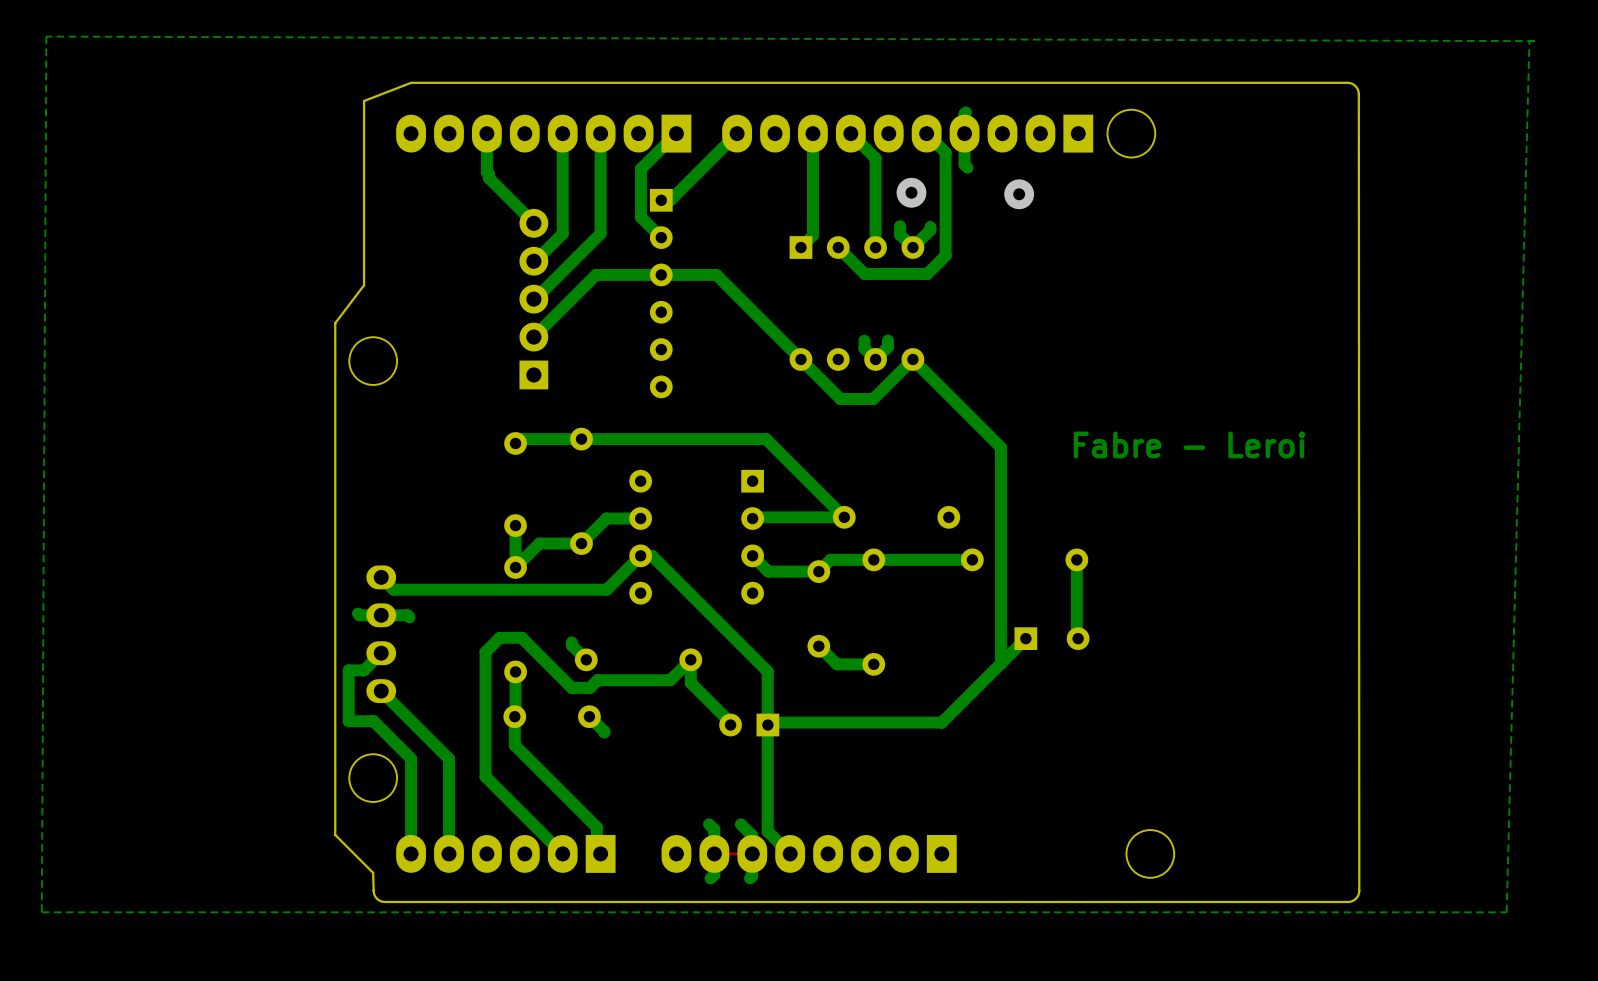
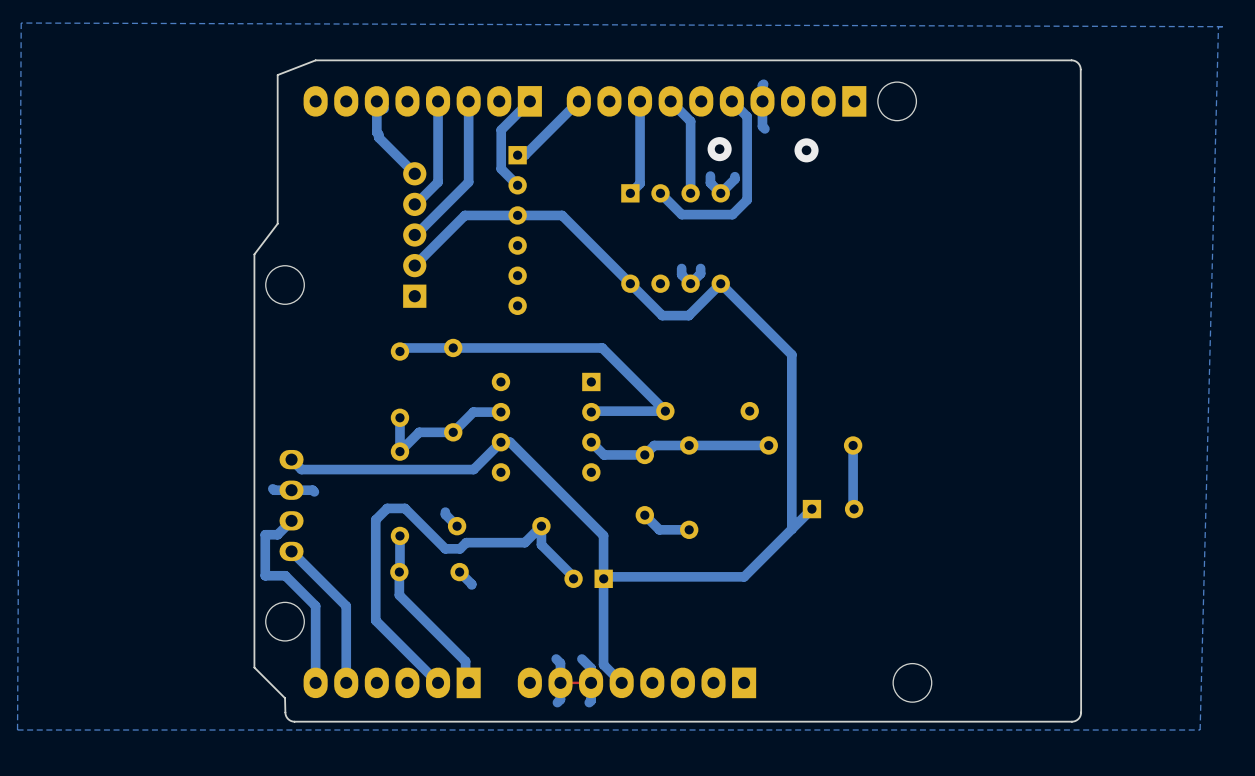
text: Fabre - Leroi (1189, 444) -> none

